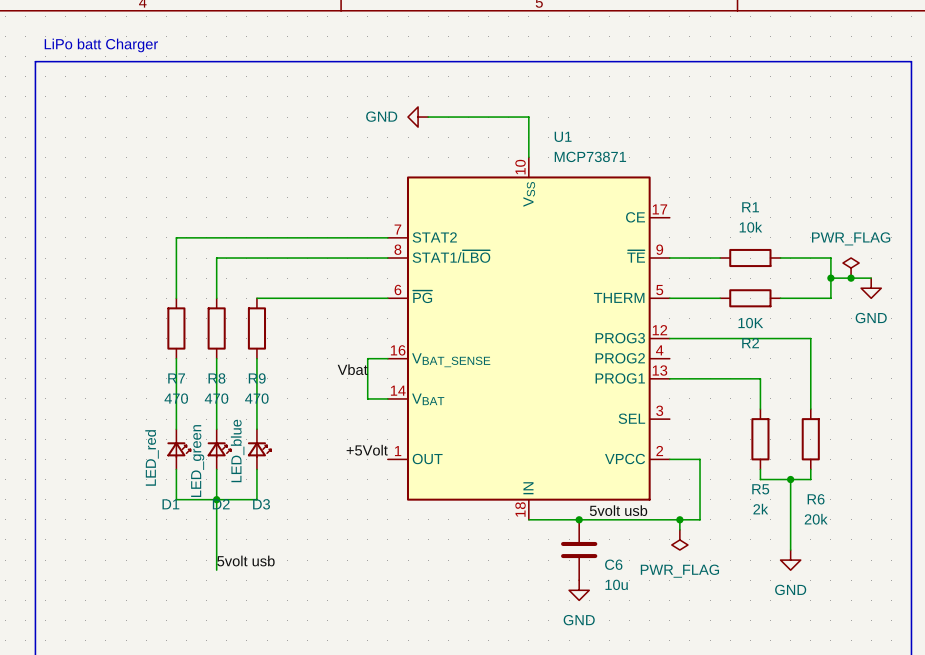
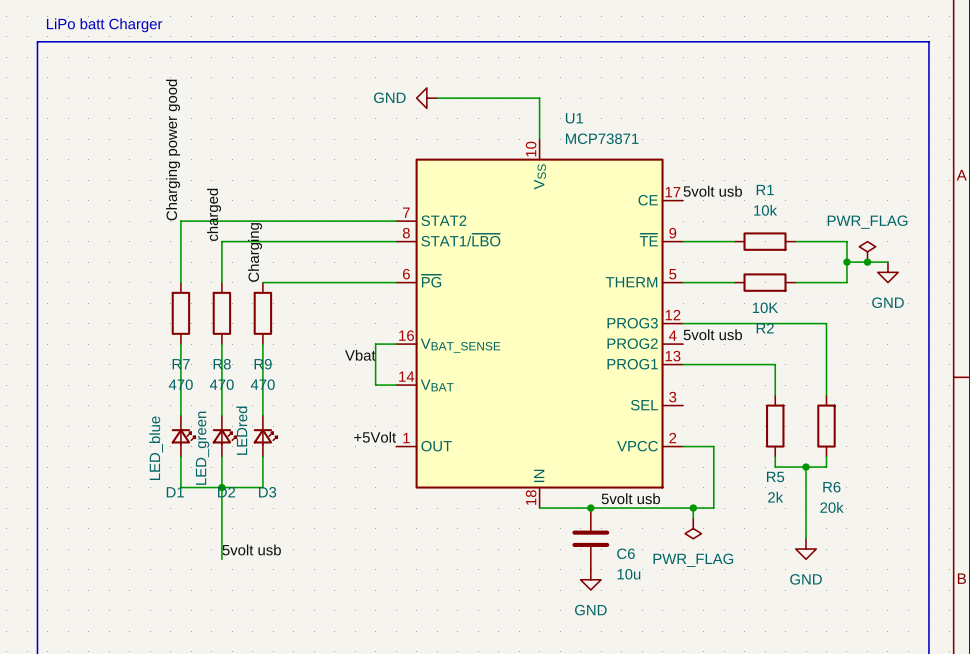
label: none -> Charging power good (173, 150)
label: none -> 5volt usb (712, 191)
label: none -> charged (214, 214)
label: none -> Charging (255, 252)
label: none -> 5volt usb (712, 334)
D3 value: LED_blue (237, 450) -> LEDred (241, 430)
D1 value: LED_red (152, 457) -> LED_blue (156, 448)

